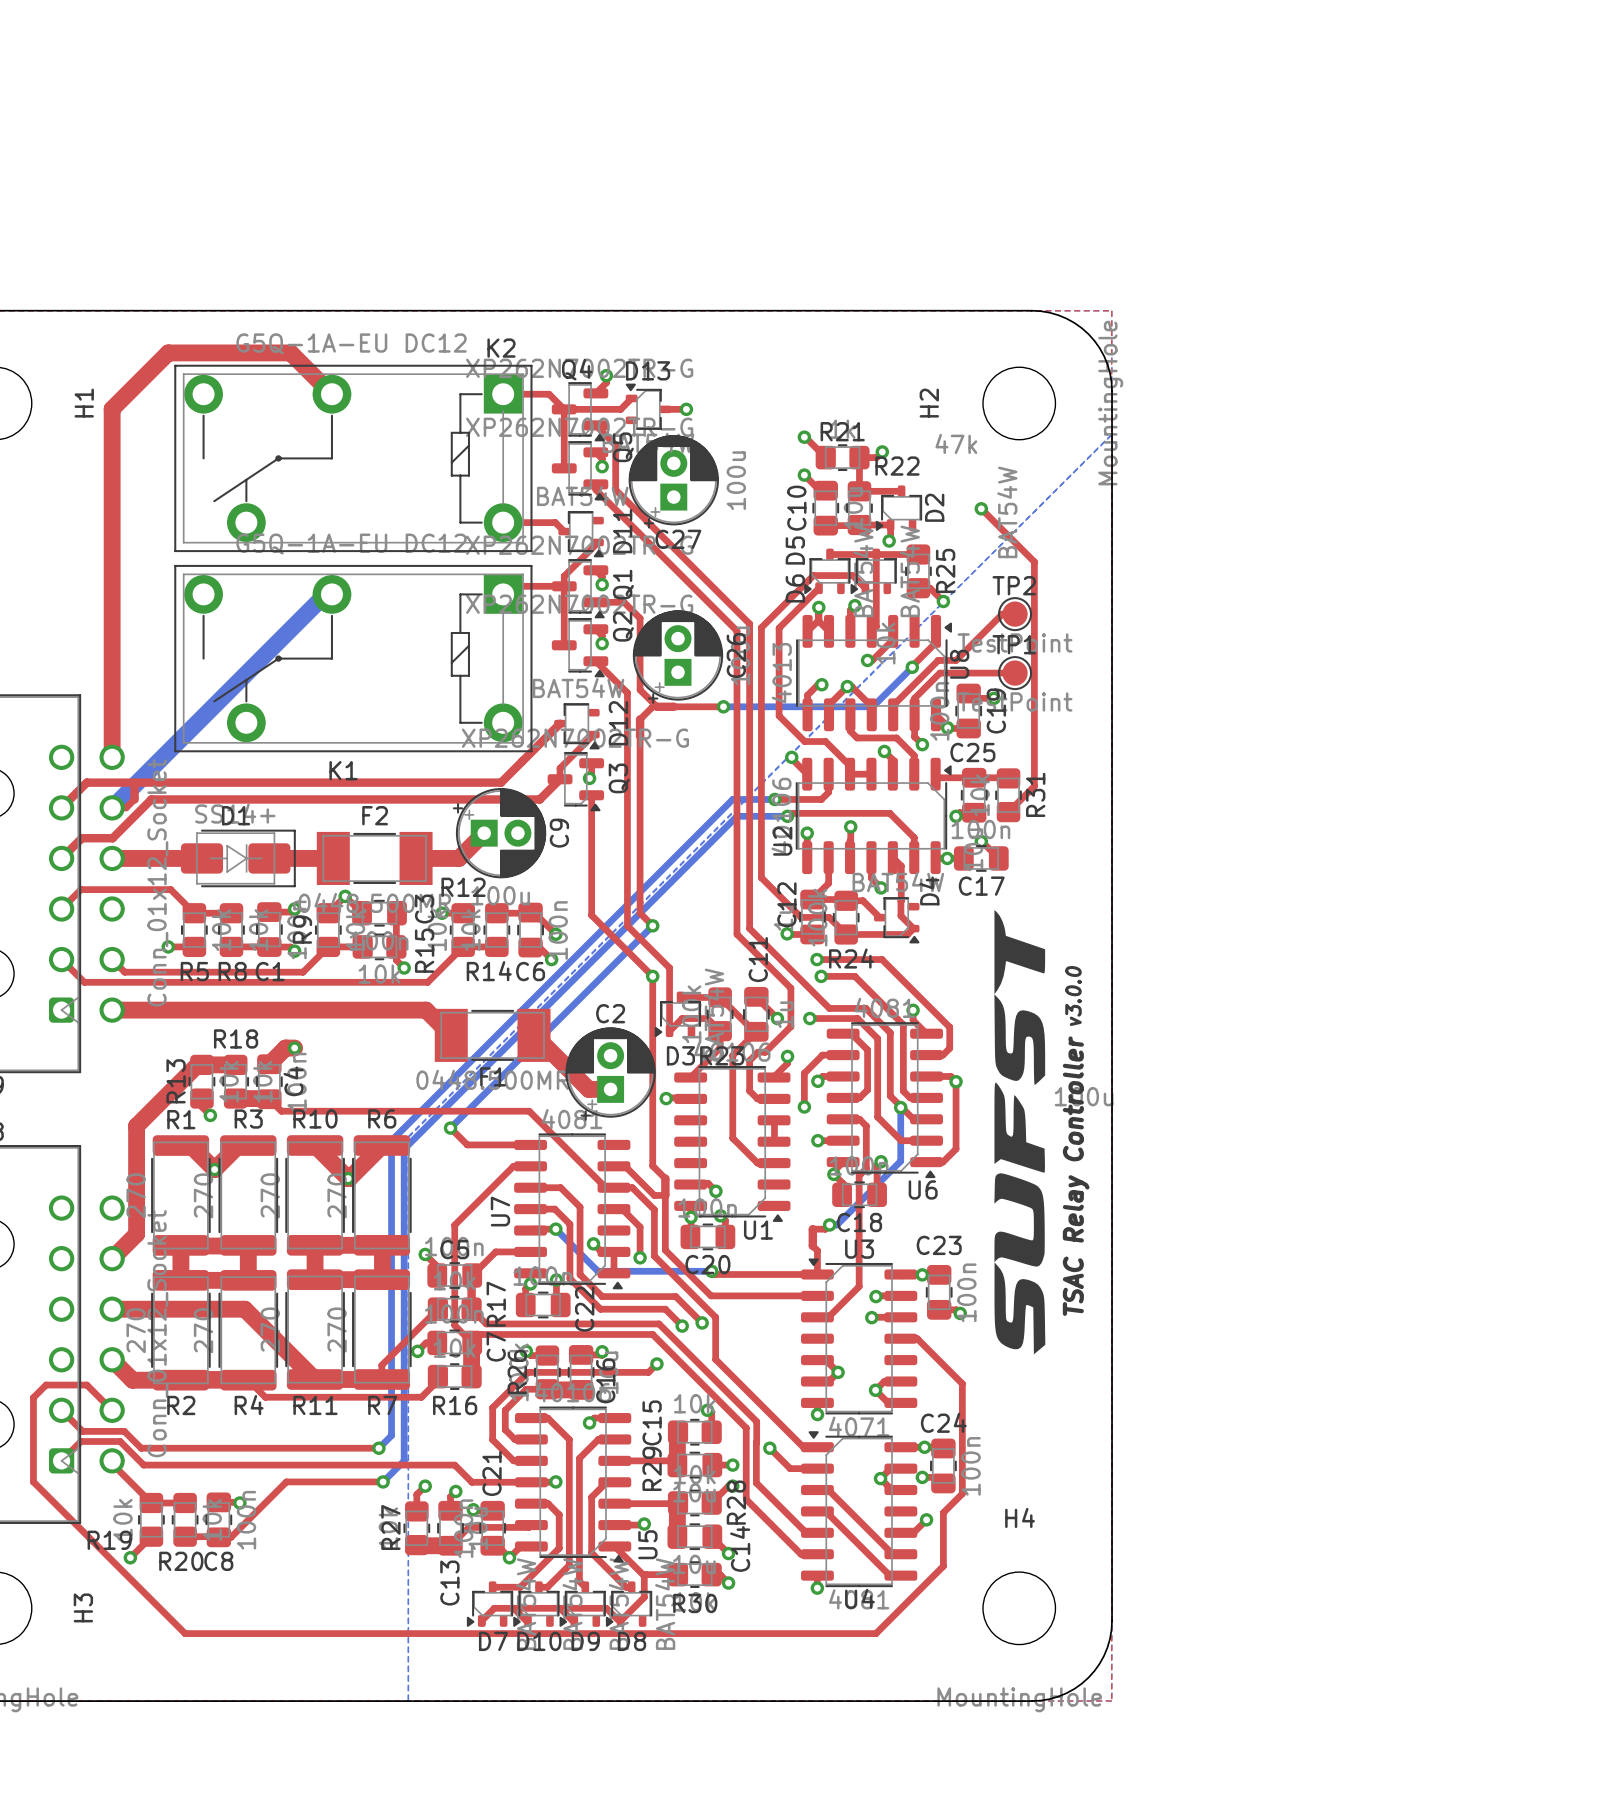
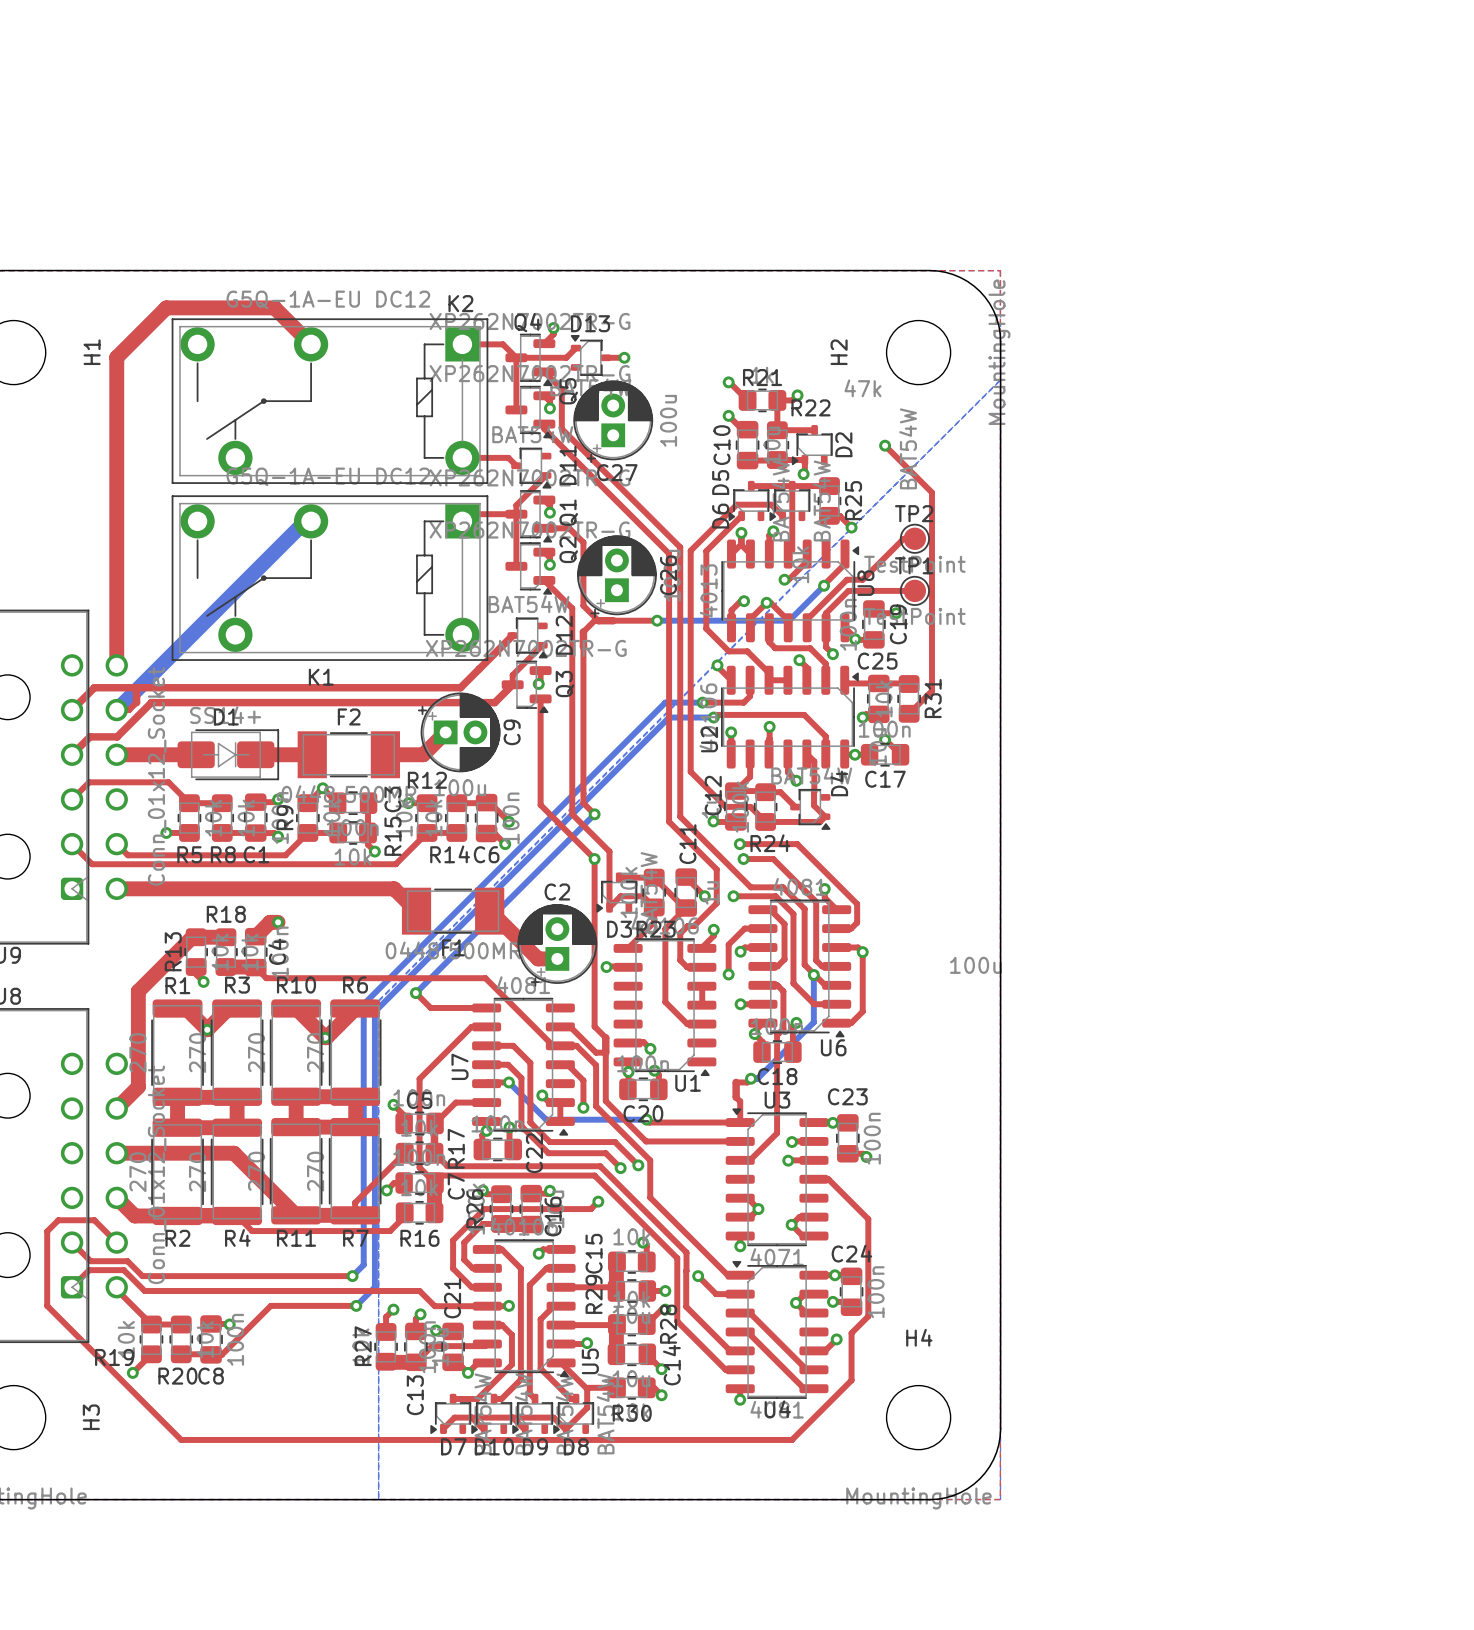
drawing: [994, 909, 1046, 1355] -> none
text: v3.0.0 (1073, 995) -> none
text: TSAC Relay Controller (1076, 1176) -> none

